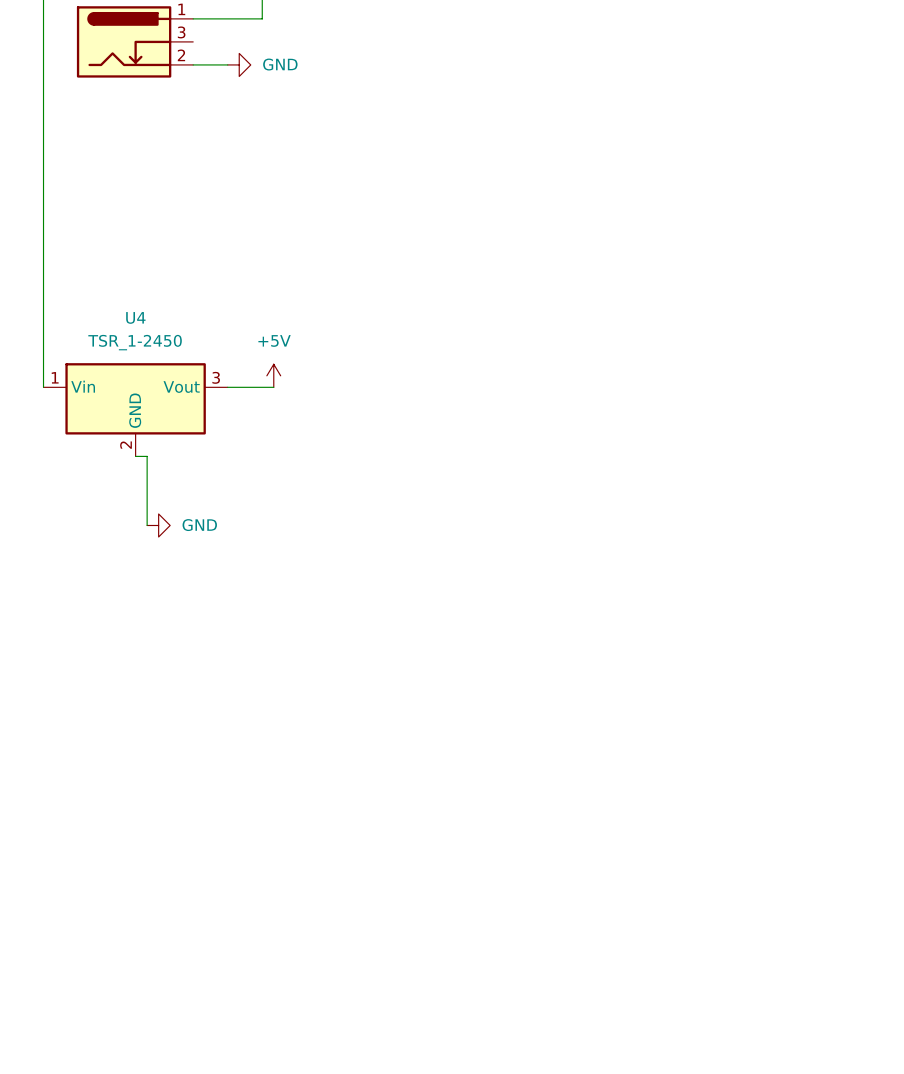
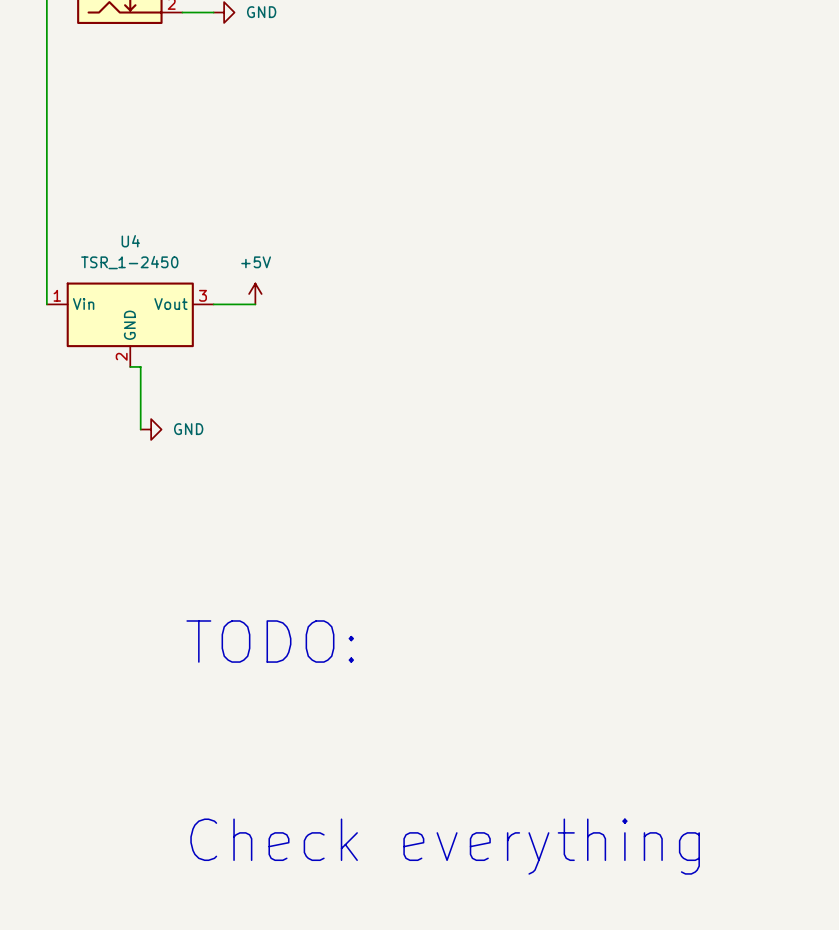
text: none -> TODO: (270, 641)
text: none -> Check everything (445, 846)

